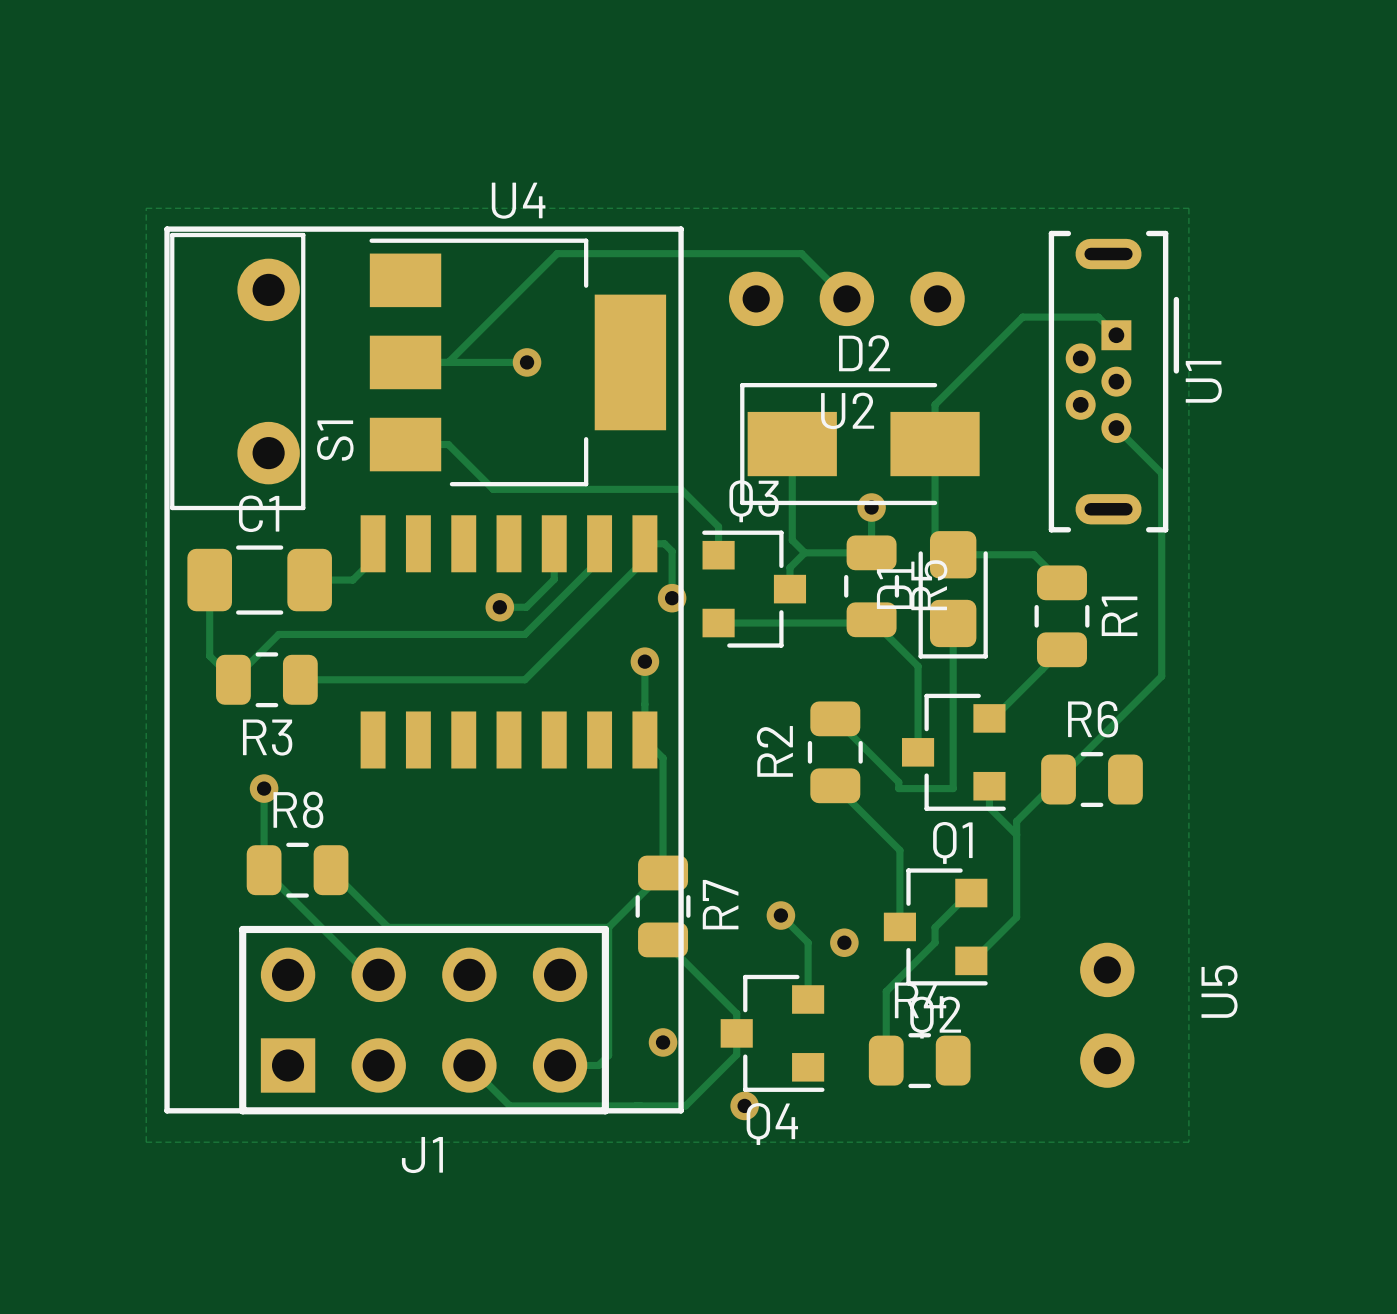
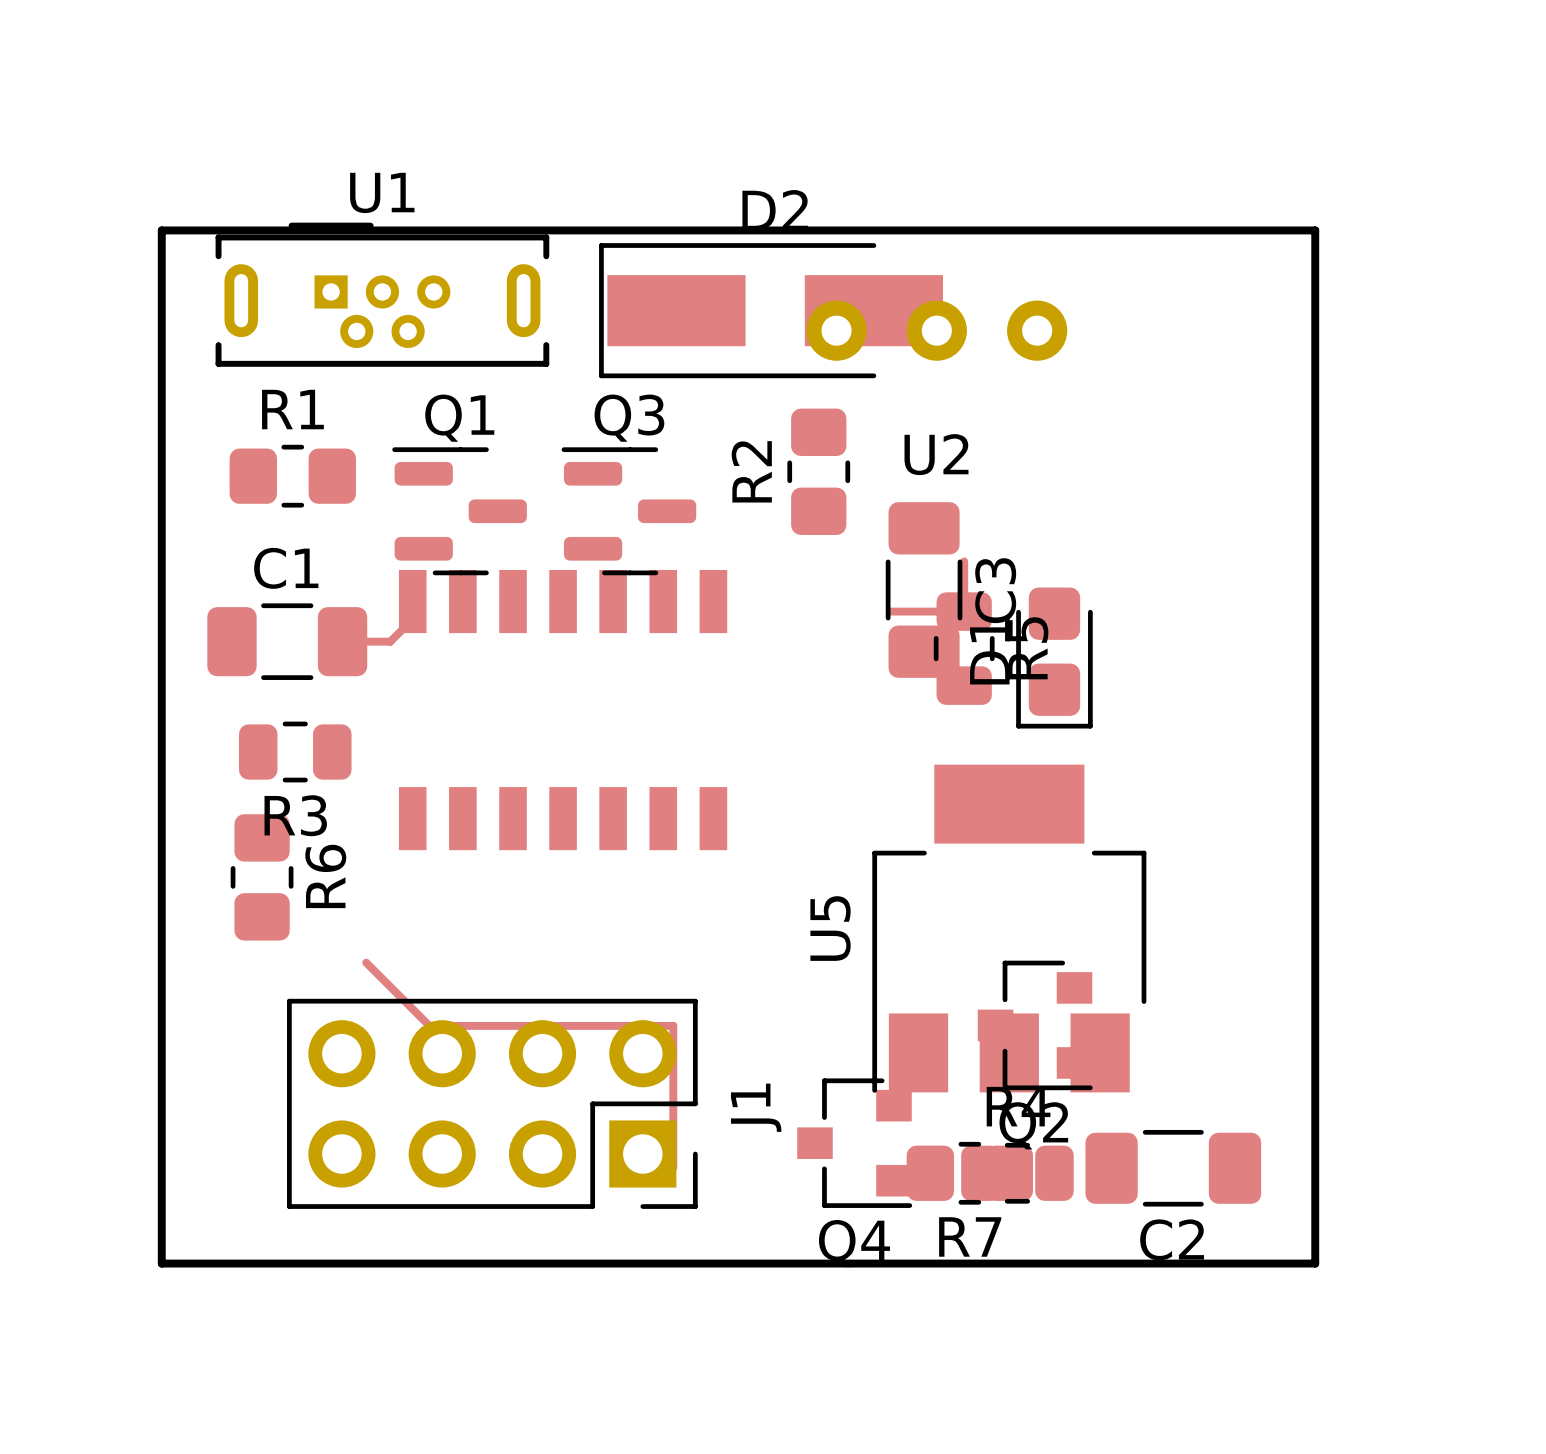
board edge: none -> (161, 230) (1315, 230) (1315, 1263) (161, 1263) (161, 230)
J1 footprint: [164, 226, 684, 1115] -> [287, 998, 698, 1209]
track: (846, 298) (801, 253) (557, 253) (448, 362) -> none
track: (1116, 335) (1098, 317) (1022, 317) (935, 404) (935, 536) (953, 554) (1033, 554) (1061, 582) -> none
track: (405, 362) (527, 362) -> none
U4: (517, 362) -> none
via: (527, 362) -> none
S1: (237, 371) -> none
U1 rotation: 0° (1113, 381) -> 90° counterclockwise (382, 294)
U1 position: (1113, 381) -> (382, 294)
D2 footprint: [740, 383, 980, 506] -> [599, 243, 944, 379]
track: (1116, 428) (1161, 473) (1161, 676) (1016, 821) (1016, 917) (971, 960) -> none
track: (405, 444) (448, 444) (493, 489) (681, 489) (718, 526) (718, 555) -> none
track: (792, 444) (792, 540) (804, 552) (789, 567) (789, 589) -> none
via: (871, 507) -> none
Q3 footprint: [702, 530, 807, 648] -> [561, 447, 697, 576]
C3: none -> (924, 590)
track: (554, 543) (554, 579) (526, 607) (499, 607) -> none
track: (599, 543) (599, 559) (524, 634) (278, 634) (233, 679) (209, 656) (209, 580) -> none
R1 footprint: [1034, 565, 1090, 668] -> [229, 444, 356, 508]
track: (672, 598) (672, 551) (664, 543) (644, 543) (644, 559) (524, 679) (300, 679) -> none
via: (672, 598) -> none
via: (499, 607) -> none
R1 name position: R1 (1119, 616) -> R1 (292, 409)
track: (718, 623) (868, 623) (871, 619) (918, 666) (918, 752) -> none
track: (953, 623) (953, 788) (898, 788) (898, 782) (835, 718) -> none
track: (1061, 649) (993, 718) (989, 718) -> none
track: (644, 661) (644, 739) (663, 758) (663, 872) (608, 927) -> none
via: (644, 661) -> none
Q1 footprint: [901, 693, 1006, 811] -> [392, 447, 527, 576]
R2 footprint: [807, 701, 863, 804] -> [787, 408, 851, 535]
R6 name position: R6 (1093, 719) -> R6 (325, 876)
R6 footprint: [1041, 752, 1143, 808] -> [230, 814, 294, 941]
track: (835, 785) (899, 850) (899, 926) -> none
track: (989, 786) (989, 807) (1016, 834) -> none
track: (264, 788) (264, 870) (368, 974) (378, 974) -> none
via: (264, 788) -> none
Q1 name position: Q1 (952, 842) -> Q1 (459, 418)
R7 footprint: [635, 855, 691, 958] -> [906, 1141, 1034, 1205]
R8: (297, 870) -> none
track: (971, 893) (935, 927) (935, 942) (886, 991) (886, 1060) -> none
R7 name position: R7 (720, 904) -> R7 (970, 1236)
track: (780, 915) (808, 942) (808, 999) -> none
via: (780, 915) -> none
track: (663, 939) (736, 1013) (736, 1054) (685, 1105) (509, 1105) (469, 1065) -> none
via: (844, 942) -> none
U5 footprint: [1080, 942, 1135, 1088] -> [872, 764, 1147, 1093]
U5 name position: U5 (1219, 991) -> U5 (830, 928)
via: (663, 1042) -> none
C2: none -> (1173, 1168)
via: (744, 1105) -> none
J1 name position: J1 (422, 1155) -> J1 (756, 1107)

